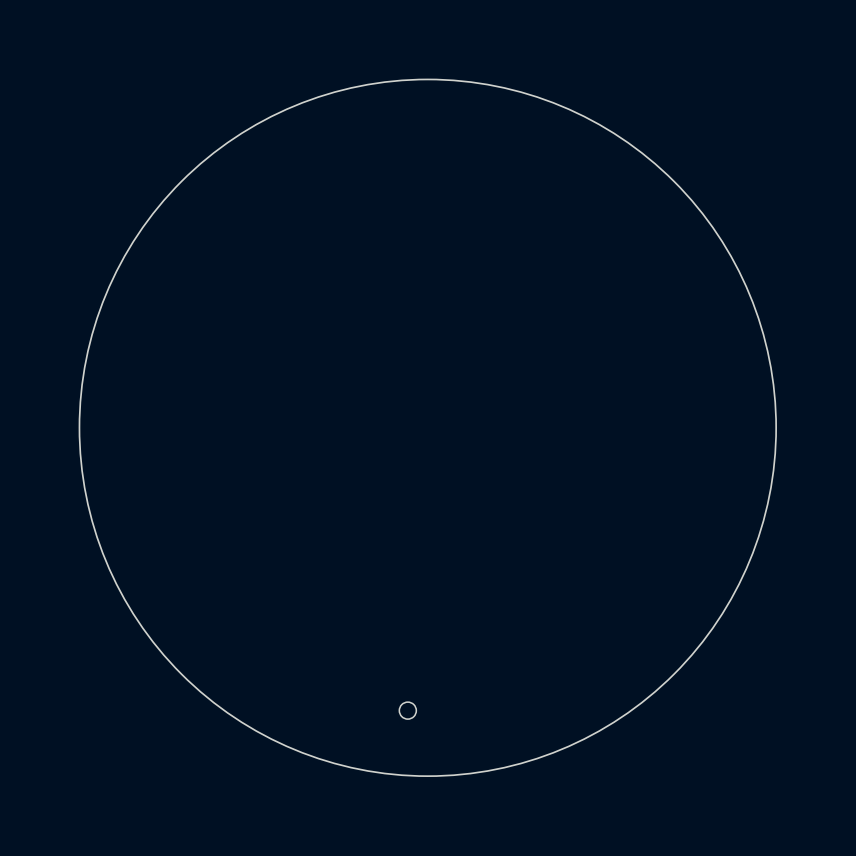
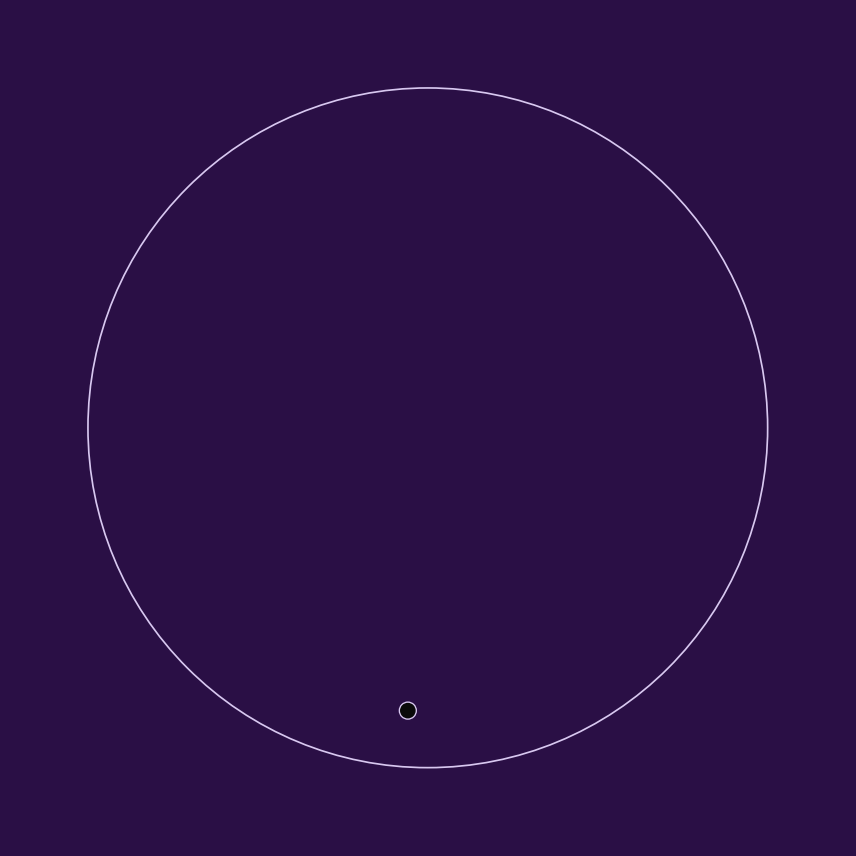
round board edge size: [78, 78, 777, 777] -> [87, 87, 769, 769]

